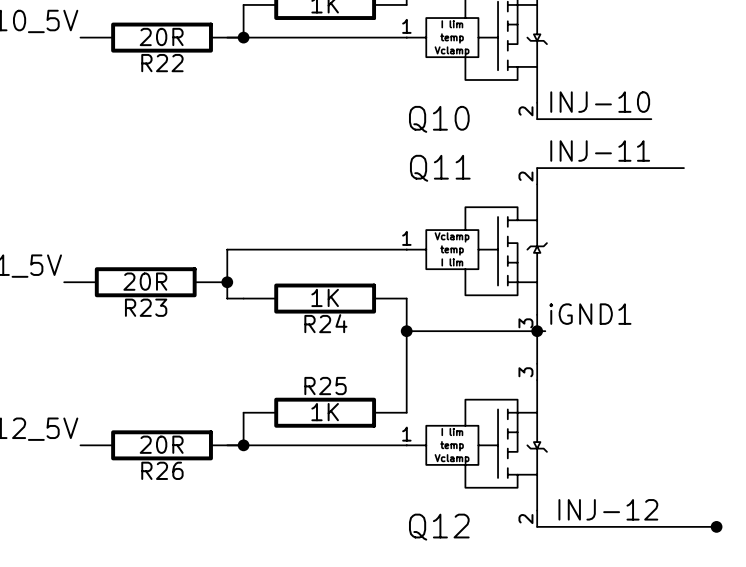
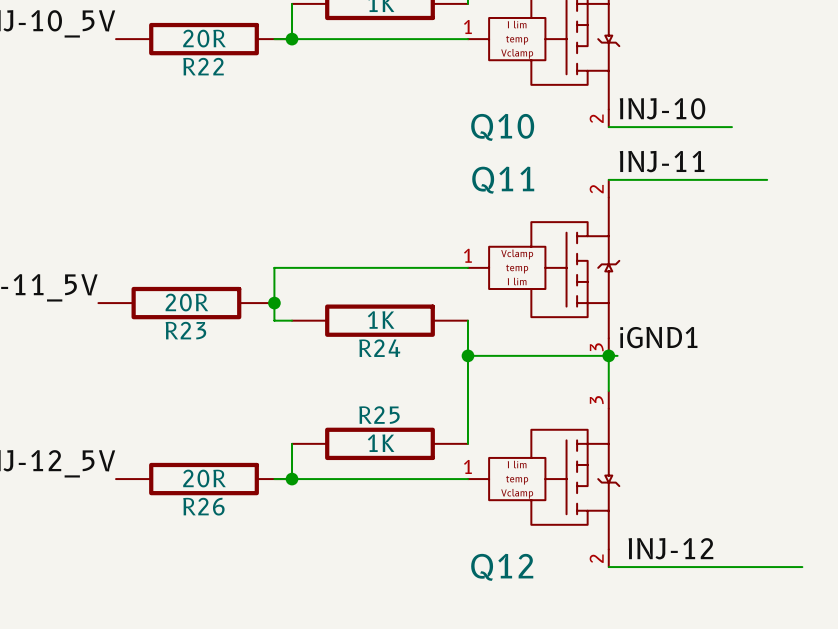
junction: (716, 526) -> none

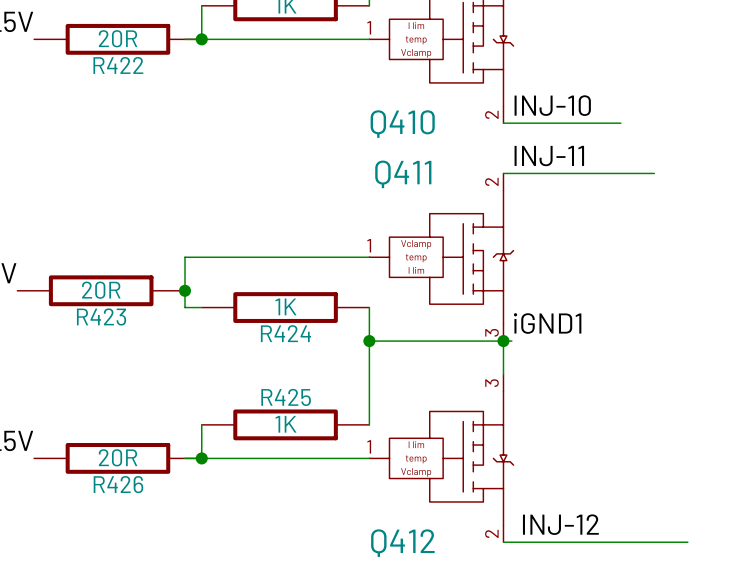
R22 name: R22 (203, 66) -> R422 (118, 65)
Q10 name: Q10 (502, 127) -> Q410 (402, 124)
Q11 name: Q11 (503, 180) -> Q411 (403, 174)
R23 name: R23 (185, 330) -> R423 (101, 316)
R24 name: R24 (379, 348) -> R424 (285, 333)
R25 name: R25 (379, 415) -> R425 (286, 397)
R26 name: R26 (203, 506) -> R426 (118, 484)
Q12 name: Q12 (502, 567) -> Q412 (402, 543)

